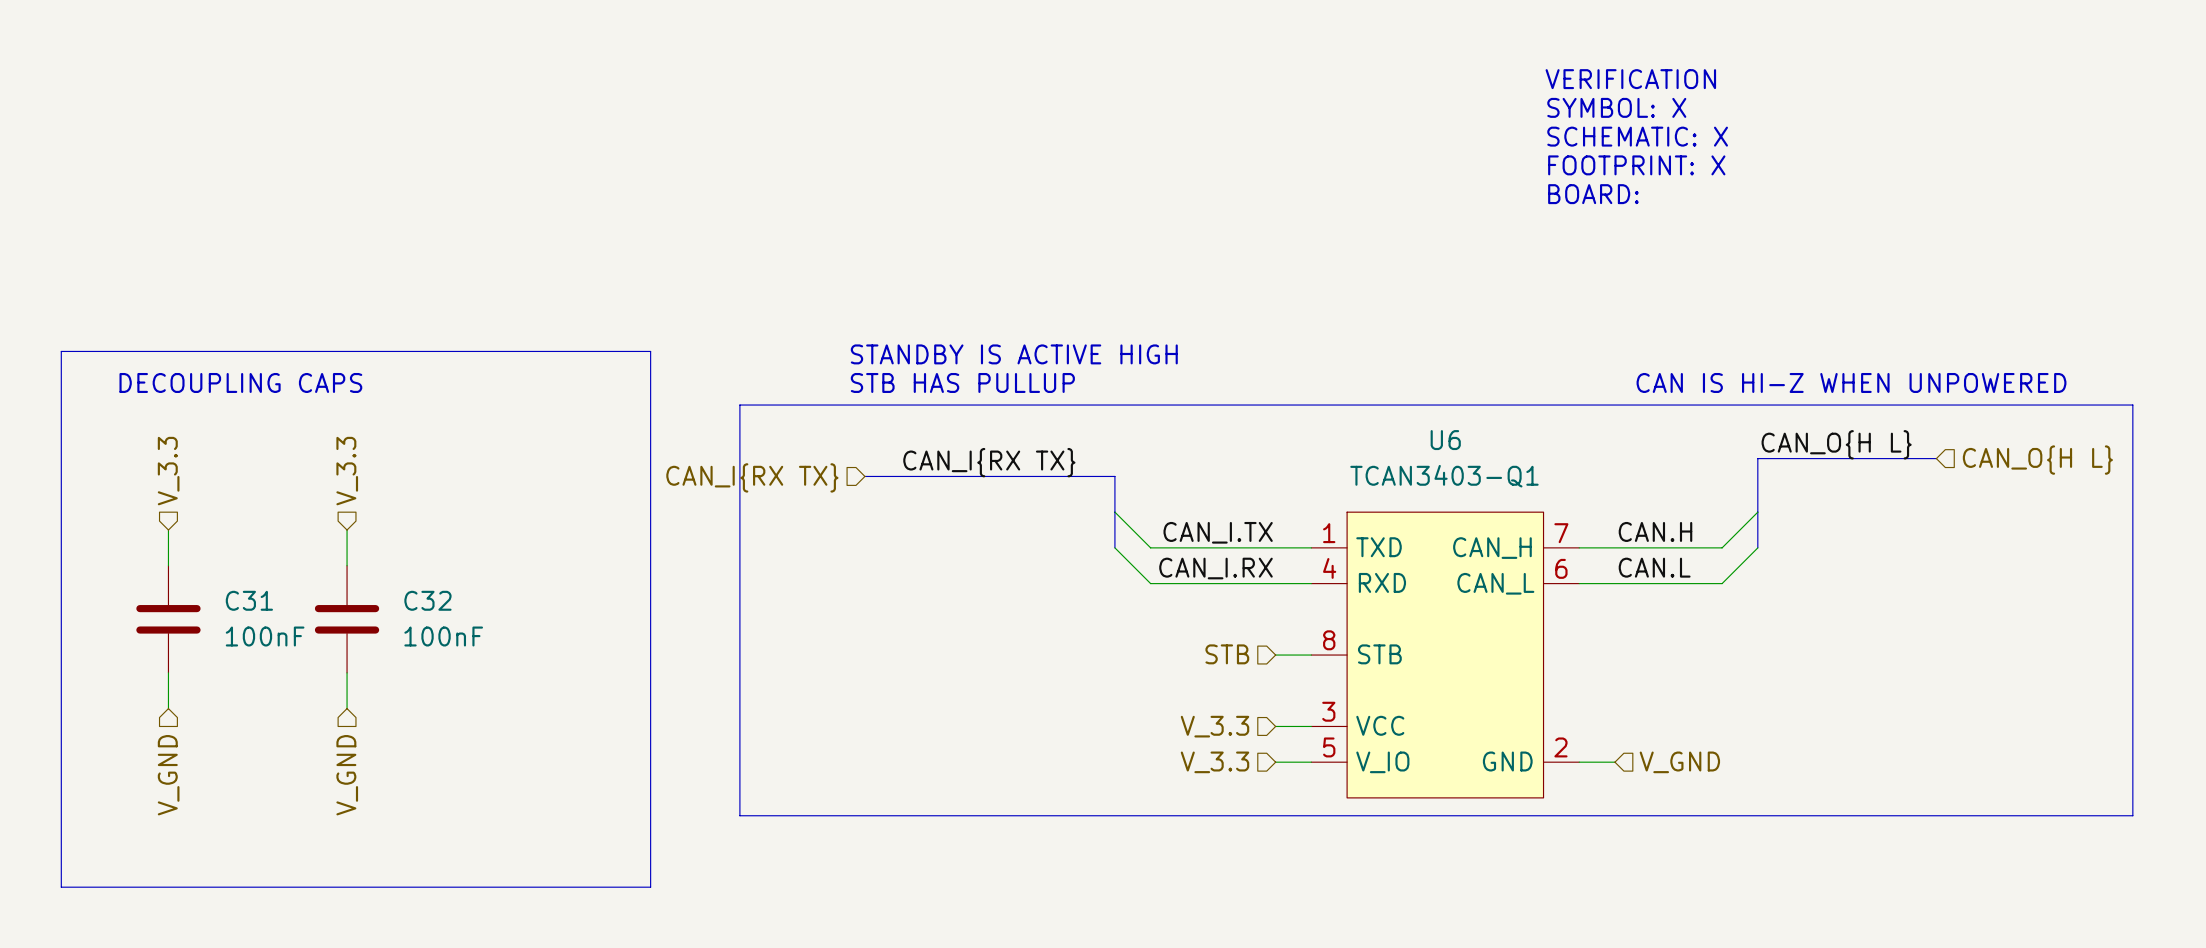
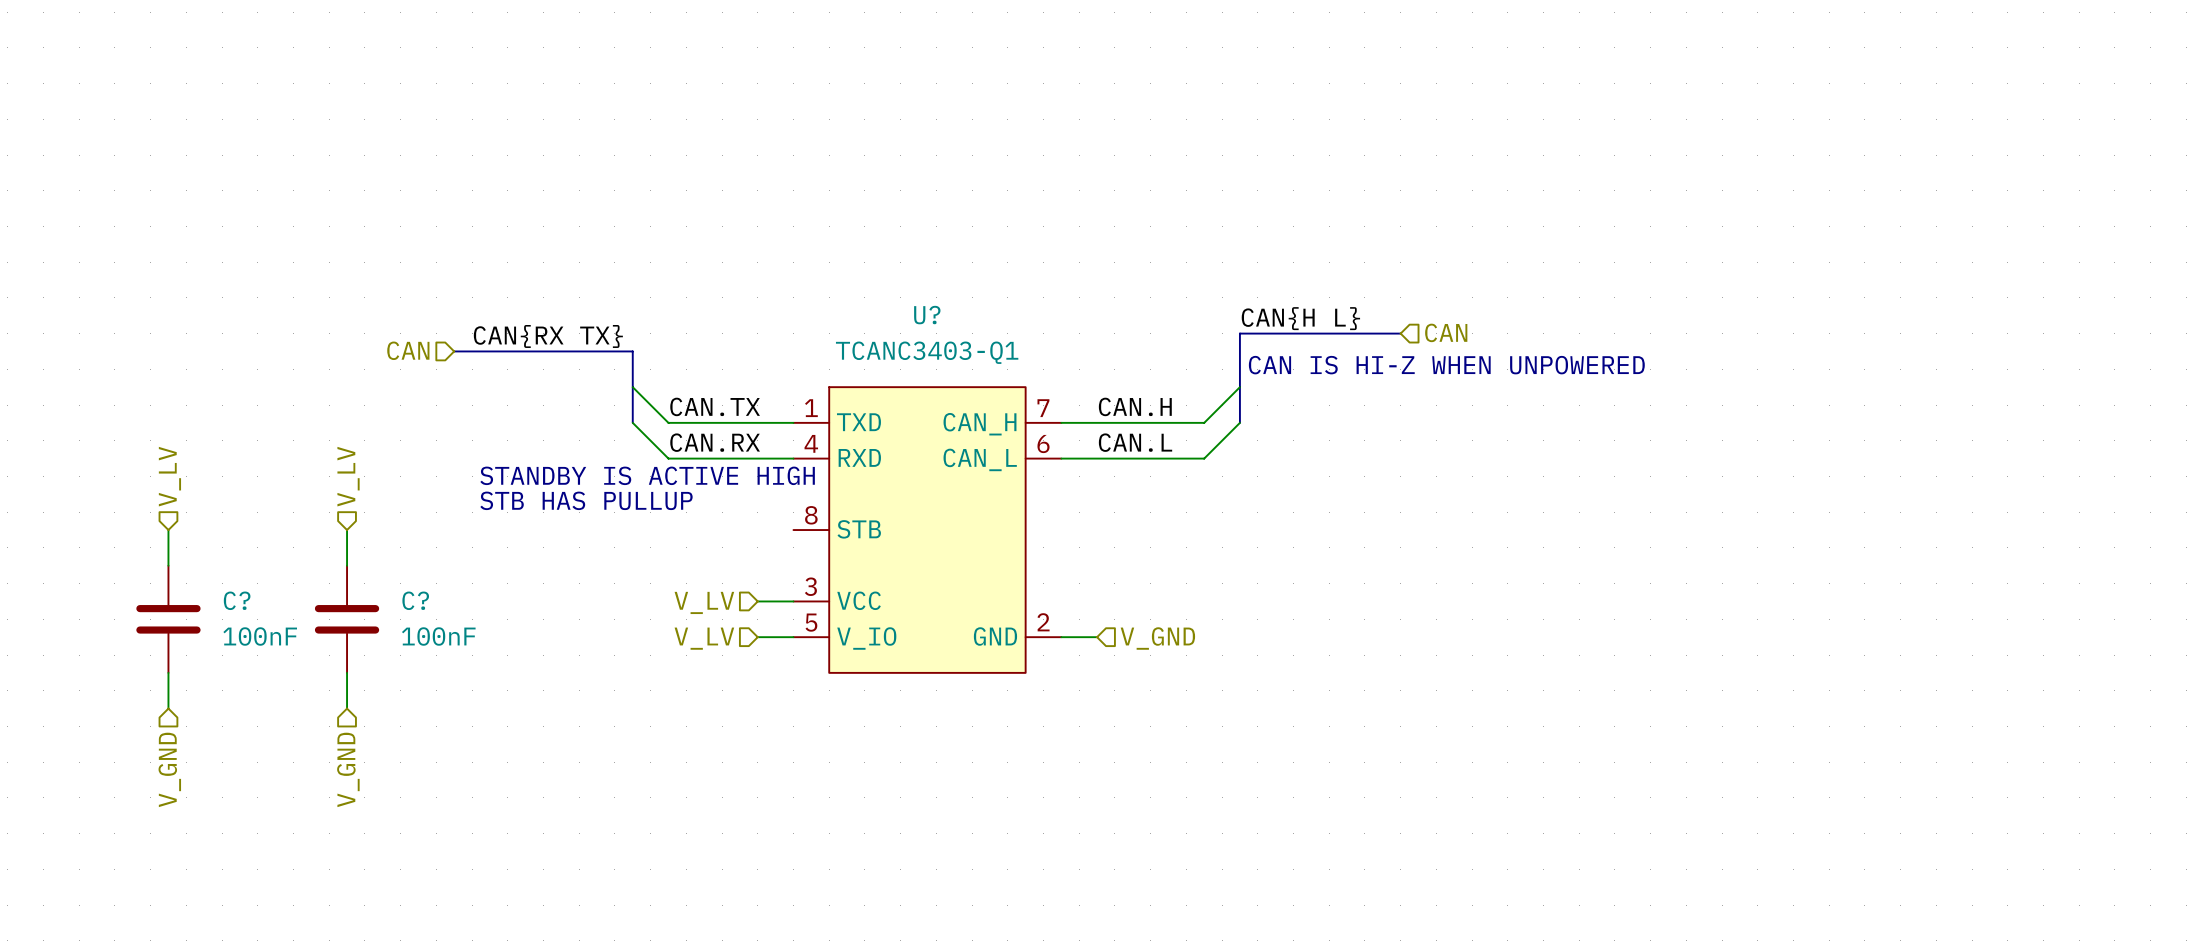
text: VERIFICATION (1630, 79) -> none
text: SYMBOL: X (1616, 107) -> none
text: SCHEMATIC: X (1637, 136) -> none
text: FOOTPRINT: X (1636, 165) -> none
text: BOARD: (1593, 194) -> none
label: none -> CAN{H L} (1300, 318)
hierarchical label: none -> CAN (1446, 332)
bus: none -> (1400, 333) (1239, 333) (1239, 422)
label: none -> CAN{RX TX} (548, 336)
hierarchical label: none -> CAN (408, 350)
line: (61, 351) (650, 351) (650, 887) (61, 887) (61, 351) -> none
bus: none -> (454, 351) (632, 351) (632, 422)
text: STANDBY IS ACTIVE HIGH (1014, 354) -> none
text: none -> CAN IS HI-Z WHEN UNPOWERED (1446, 365)
text: DECOUPLING CAPS (240, 382) -> none
text: STB HAS PULLUP (962, 382) -> none
text: CAN IS HI-Z WHEN UNPOWERED (1851, 382) -> none
wire: none -> (632, 387) (668, 422) (793, 422)
wire: none -> (1239, 387) (1204, 422) (1061, 422)
line: (739, 405) (2132, 405) (2132, 815) (739, 815) (739, 405) -> none
label: none -> CAN.TX (715, 406)
label: none -> CAN.H (1135, 406)
wire: none -> (632, 422) (668, 458) (793, 458)
wire: none -> (1239, 422) (1204, 458) (1061, 458)
label: none -> CAN.RX (715, 442)
label: none -> CAN.L (1135, 442)
label: CAN_O{H L} (1836, 444) -> none
bus: (1936, 458) (1757, 458) (1757, 547) -> none
hierarchical label: CAN_O{H L} (2037, 460) -> none
label: CAN_I{RX TX} (989, 462) -> none
hierarchical label: V_3.3 (168, 471) -> V_LV (169, 476)
hierarchical label: V_3.3 (347, 471) -> V_LV (348, 476)
text: none -> STANDBY IS ACTIVE HIGH (647, 475)
bus: (864, 476) (1114, 476) (1114, 547) -> none
hierarchical label: CAN_I{RX TX} (752, 477) -> none
text: none -> STB HAS PULLUP (586, 500)
wire: (1114, 512) (1150, 547) (1311, 547) -> none
wire: (1757, 512) (1722, 547) (1579, 547) -> none
U?: none -> TCANC3403-Q1 (927, 530)
label: CAN.H (1655, 531) -> none
label: CAN_I.TX (1218, 532) -> none
wire: (1114, 547) (1150, 583) (1311, 583) -> none
wire: (1757, 547) (1722, 583) (1579, 583) -> none
label: CAN.L (1654, 567) -> none
label: CAN_I.RX (1215, 568) -> none
C31 name: C31 (249, 600) -> C? (237, 600)
C32 name: C32 (427, 600) -> C? (415, 600)
hierarchical label: none -> V_LV (704, 602)
wire: none -> (757, 601) (793, 601)
hierarchical label: none -> V_LV (704, 638)
wire: none -> (757, 637) (793, 637)
hierarchical label: none -> V_GND (1157, 638)
hierarchical label: STB (1227, 654) -> none
wire: (1275, 655) (1311, 655) -> (1061, 637) (1097, 637)
U6: TCAN3403-Q1 (1445, 655) -> none
hierarchical label: V_3.3 (1215, 726) -> none
wire: (1275, 726) (1311, 726) -> none
hierarchical label: V_3.3 (1215, 762) -> none
wire: (1275, 762) (1311, 762) -> none
wire: (1579, 762) (1614, 762) -> none
hierarchical label: V_GND (1679, 762) -> none

